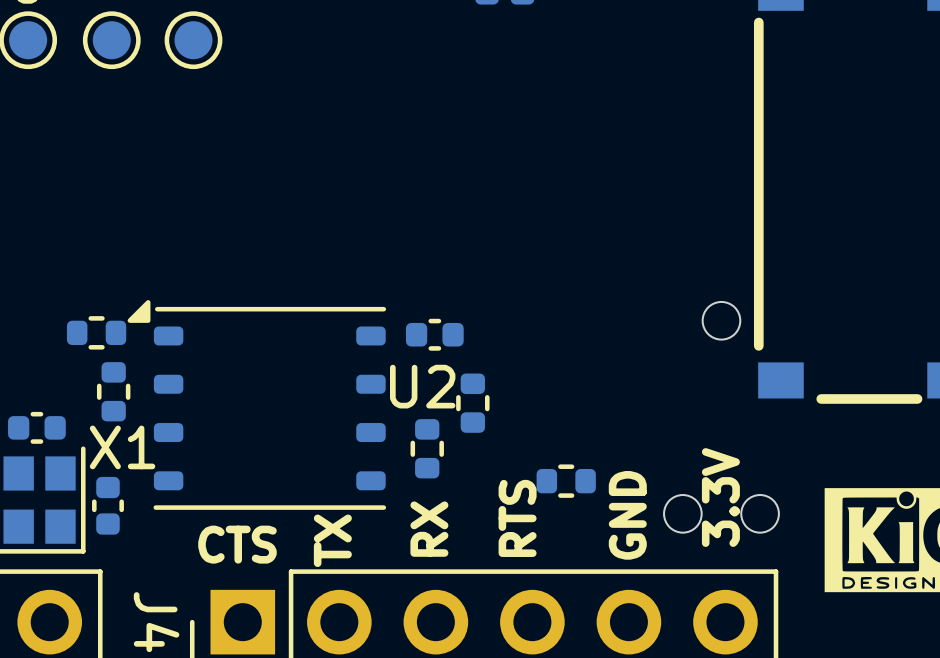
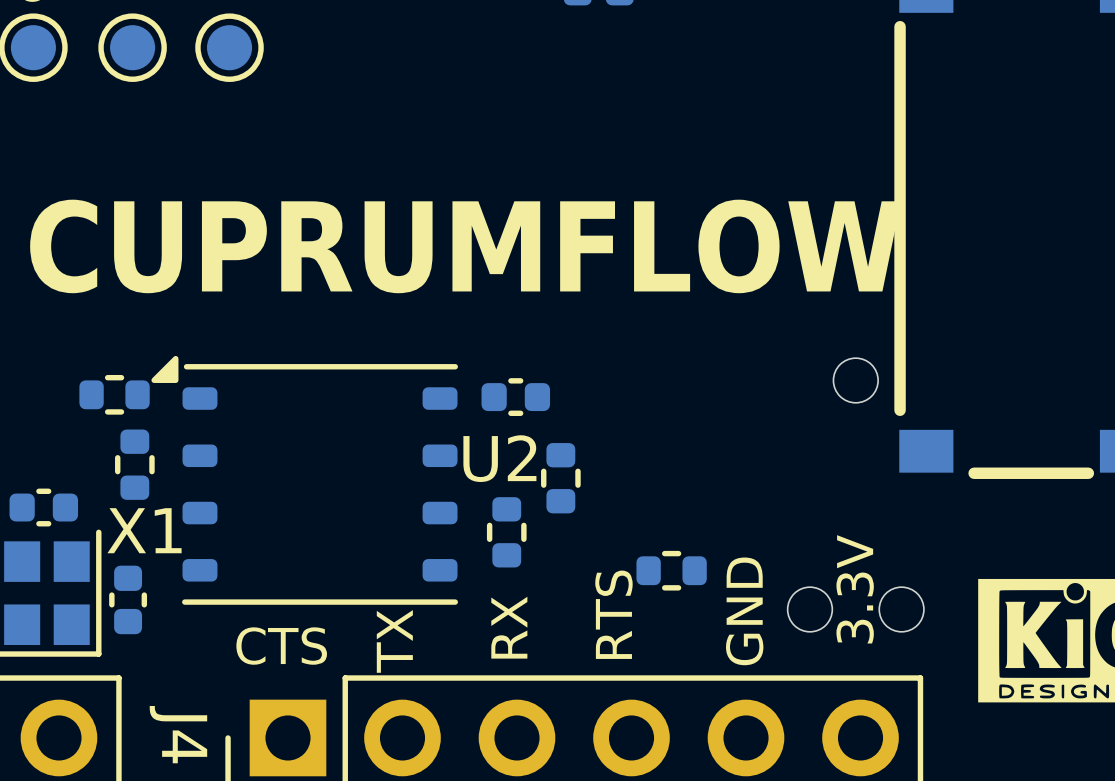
text: none -> CUPRUMFLOW (465, 246)

